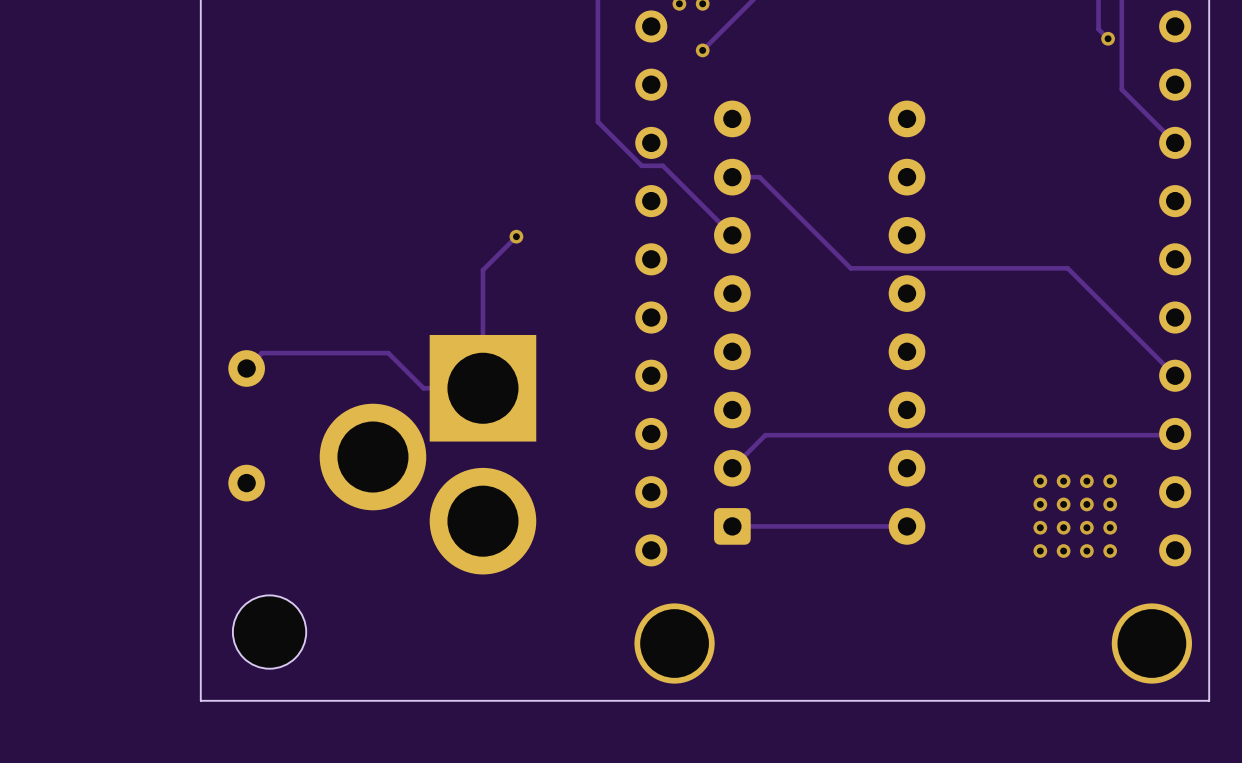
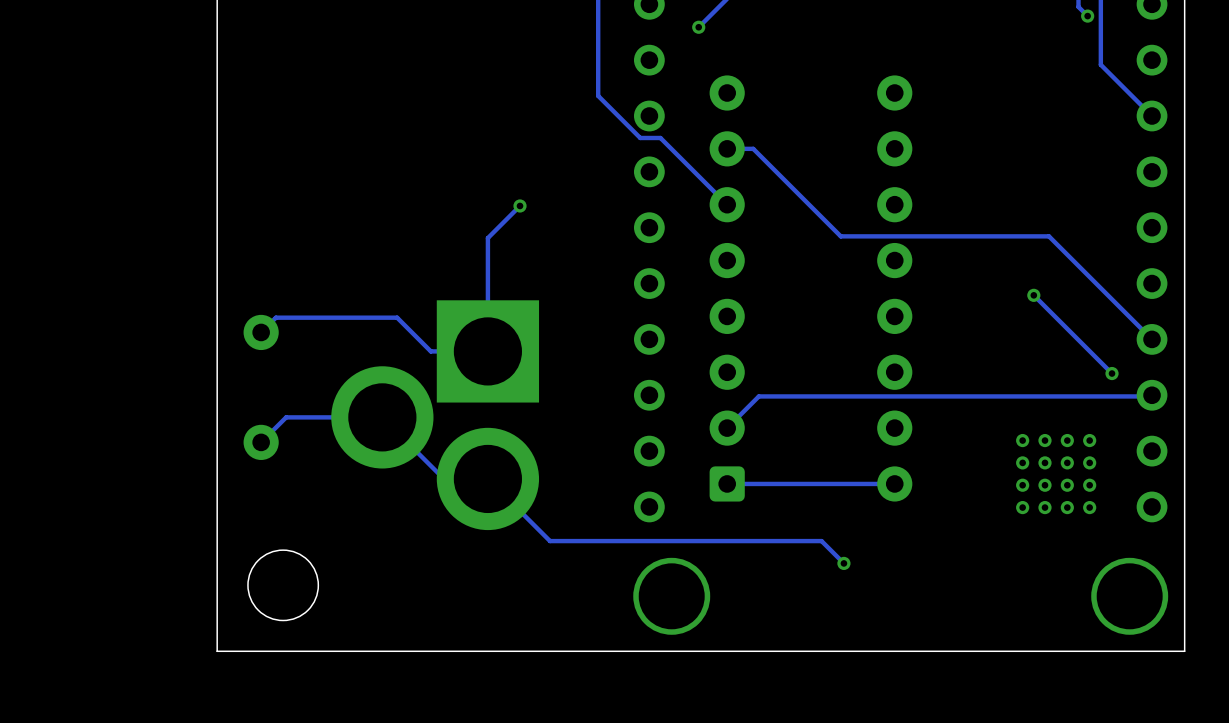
track: none -> (1033, 295) (1112, 373)
via: none -> (1033, 295)
via: none -> (1112, 373)
track: none -> (261, 442) (286, 417) (382, 417) (443, 478) (487, 478) (550, 541) (821, 541) (843, 563)
via: none -> (843, 563)

